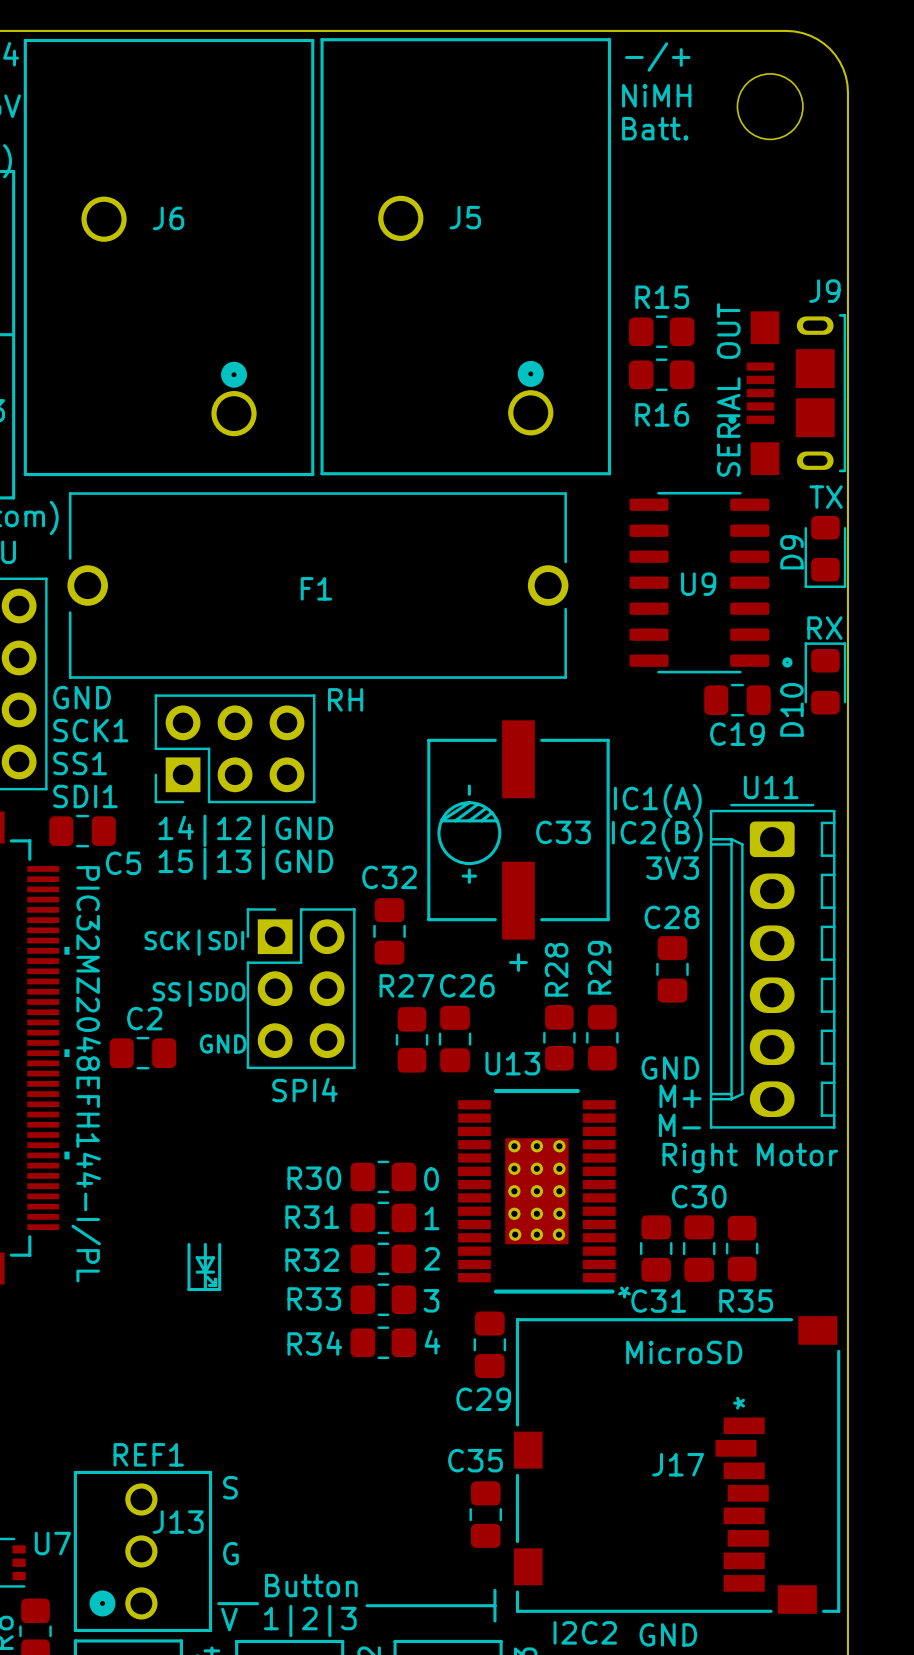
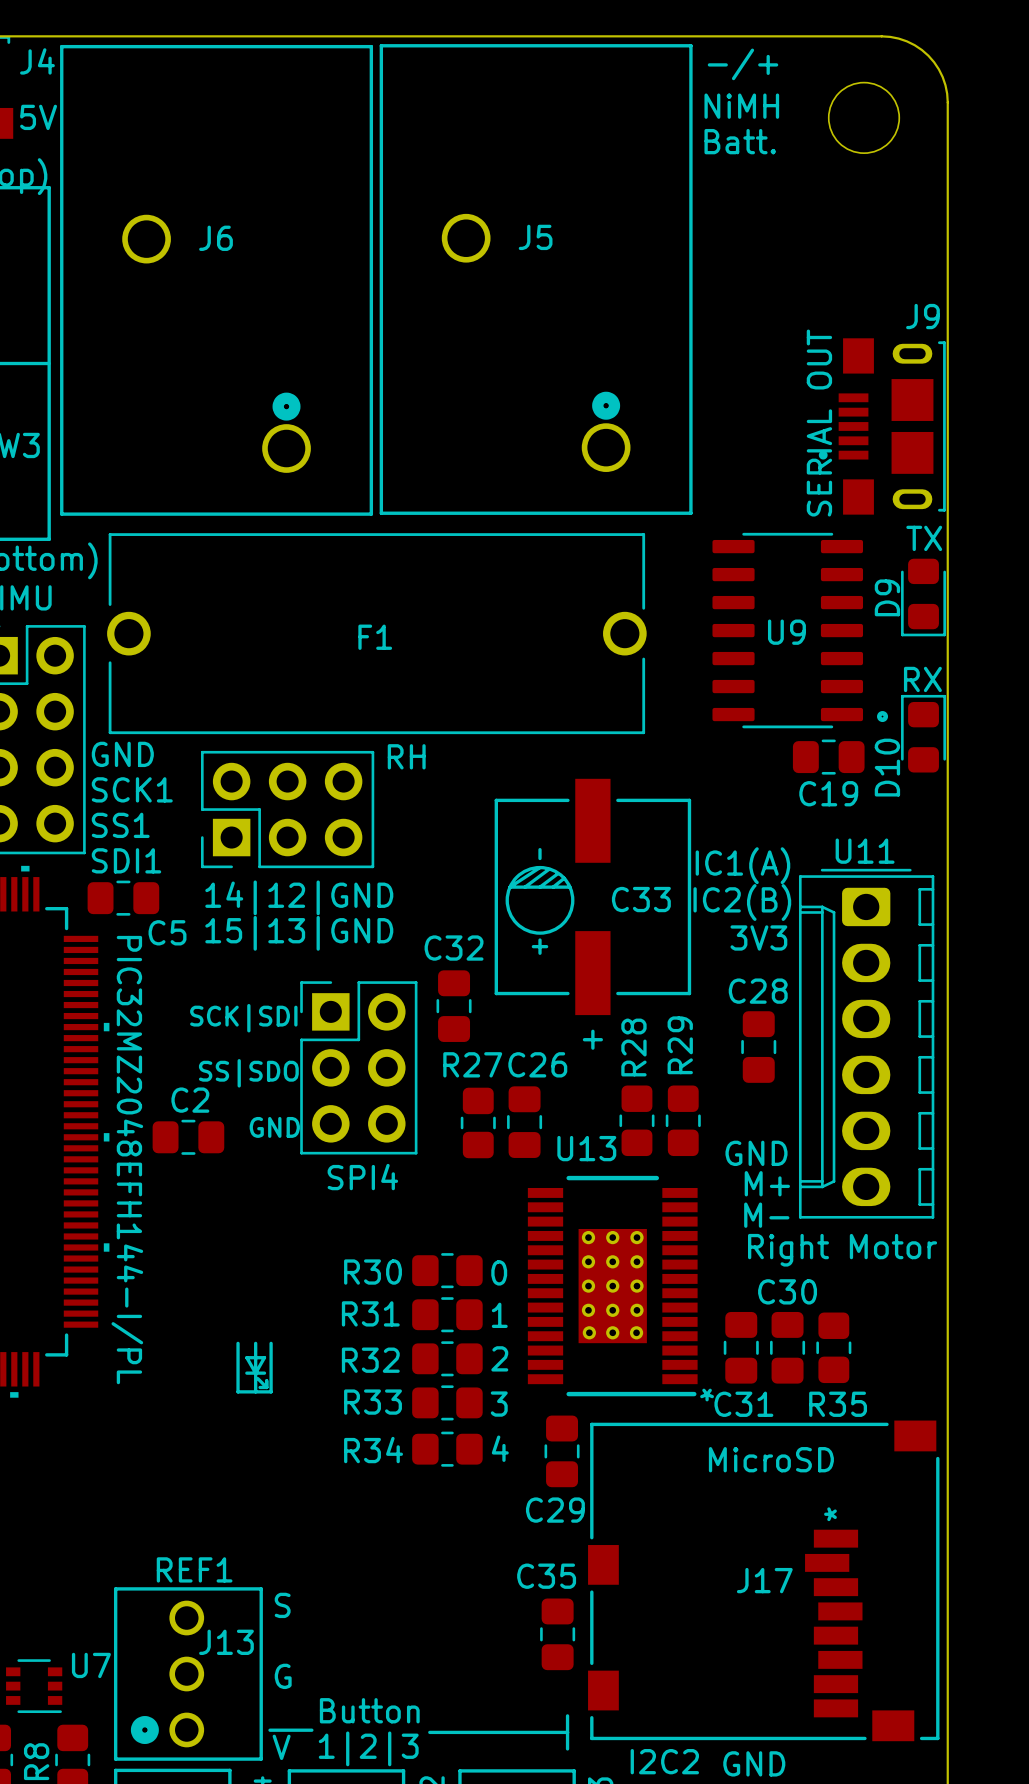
R15: (661, 331) -> none
R16: (661, 374) -> none

